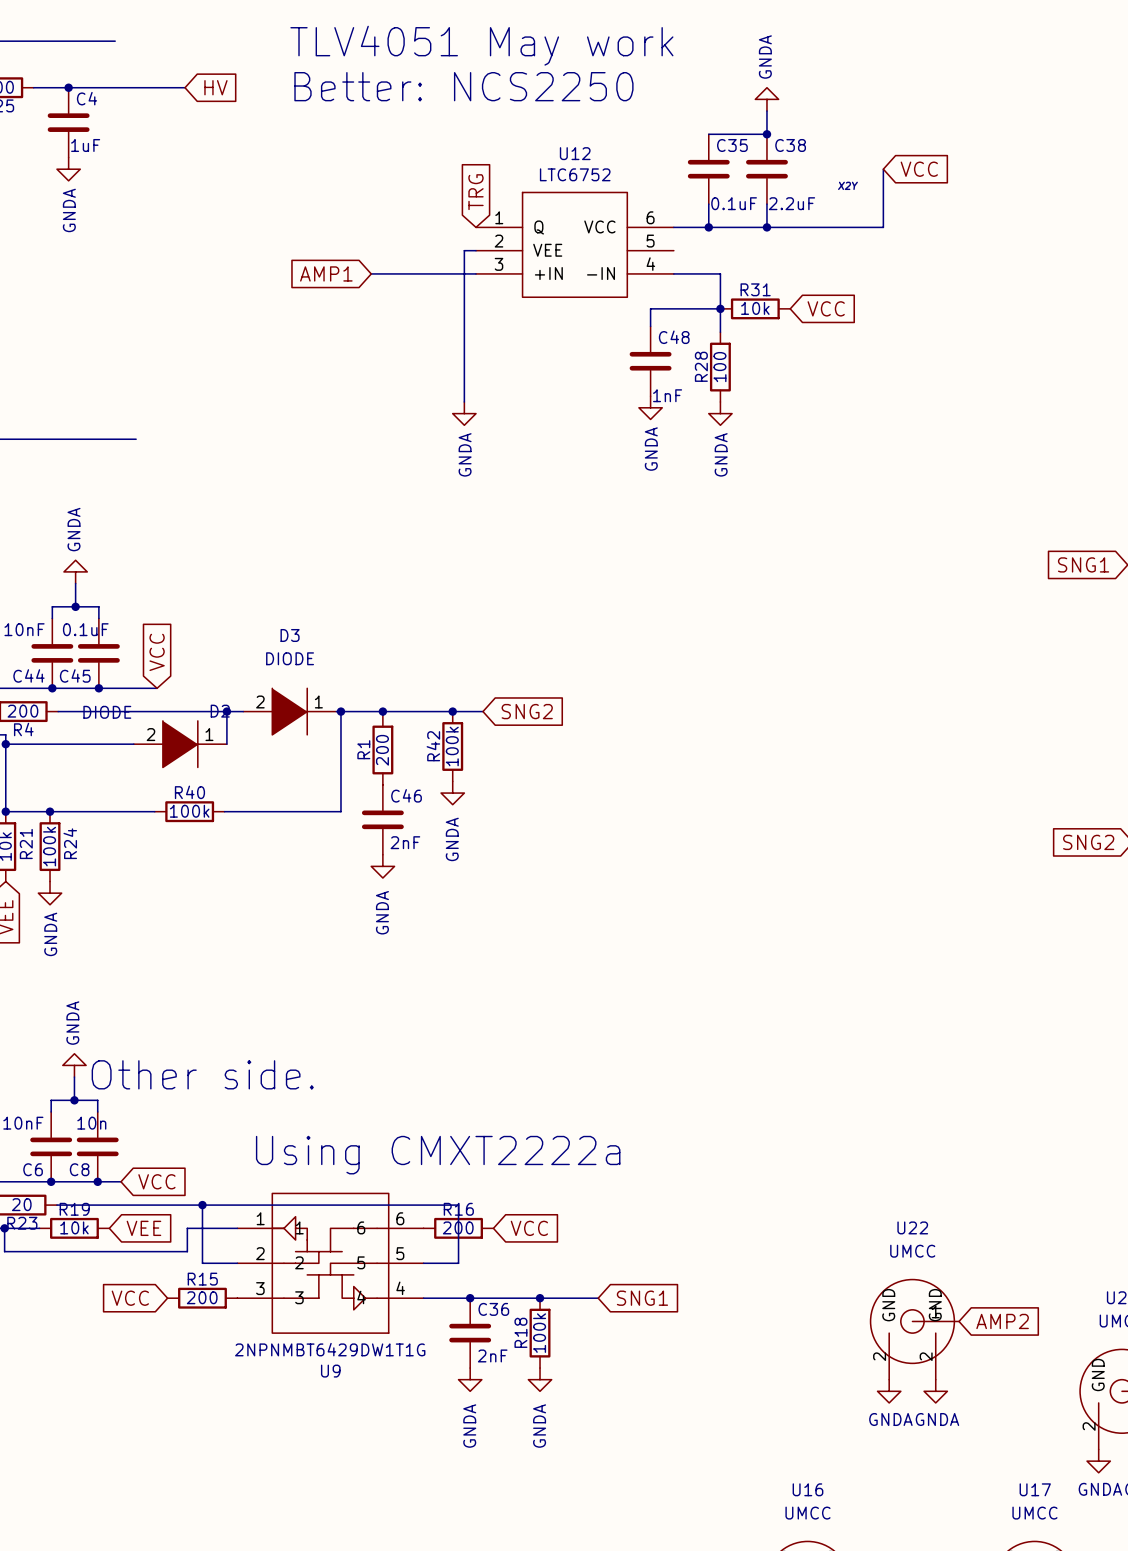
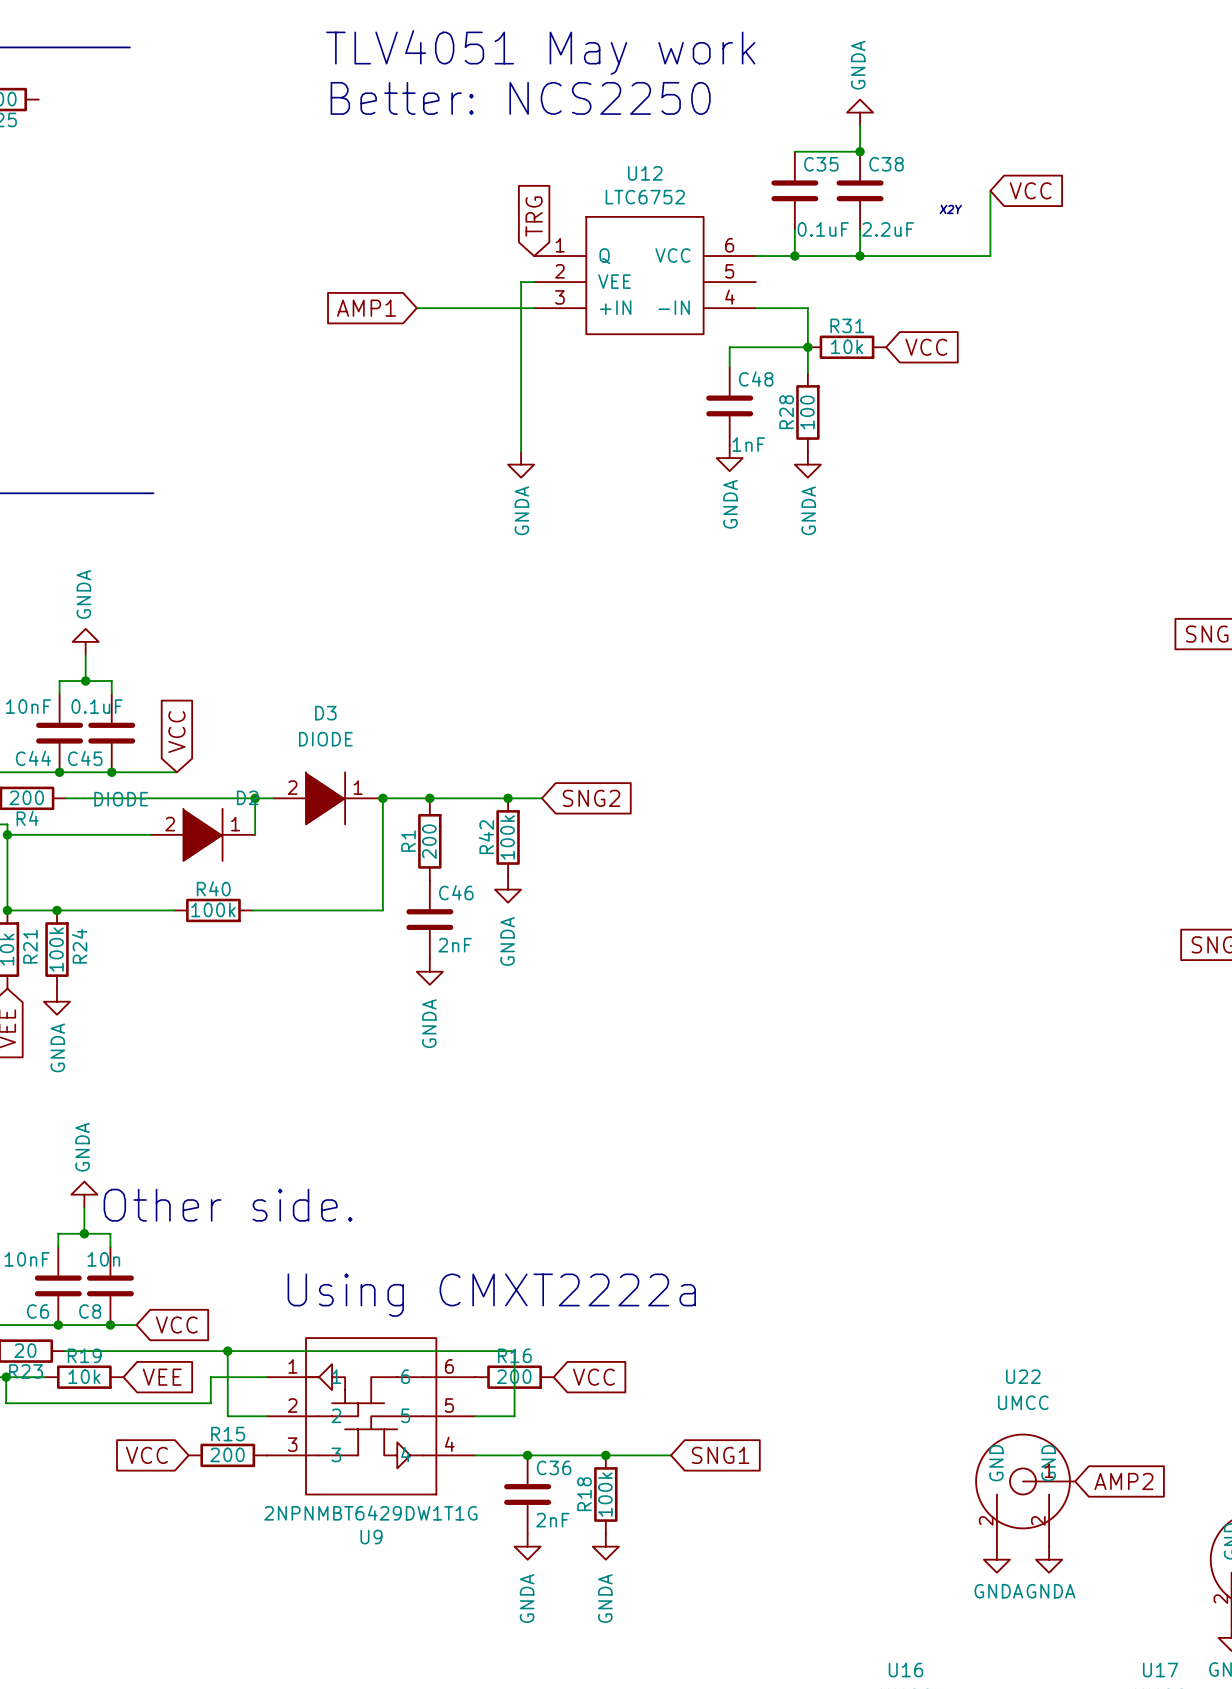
wire: (33, 87) (185, 87) -> none
junction: (68, 87) -> none
global label: HV (215, 87) -> none
C4: 1uF (68, 122) -> none
power symbol: GNDA (68, 169) -> none

